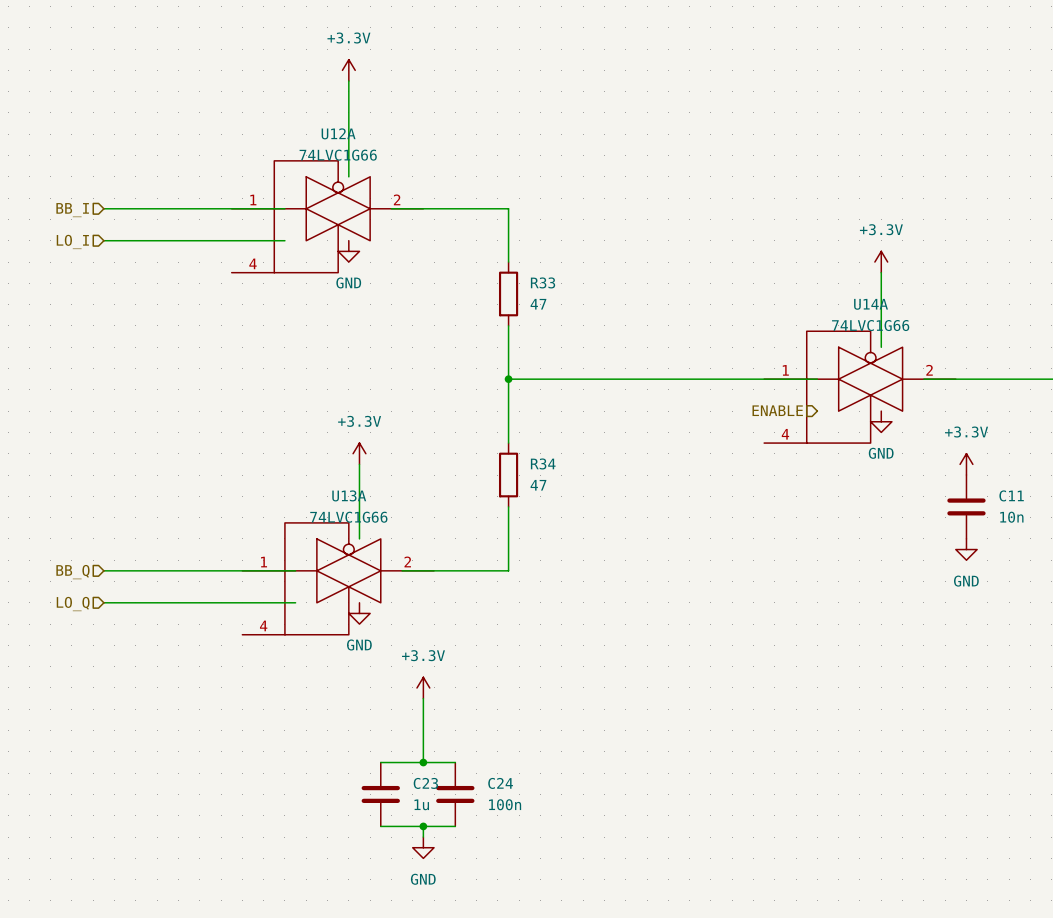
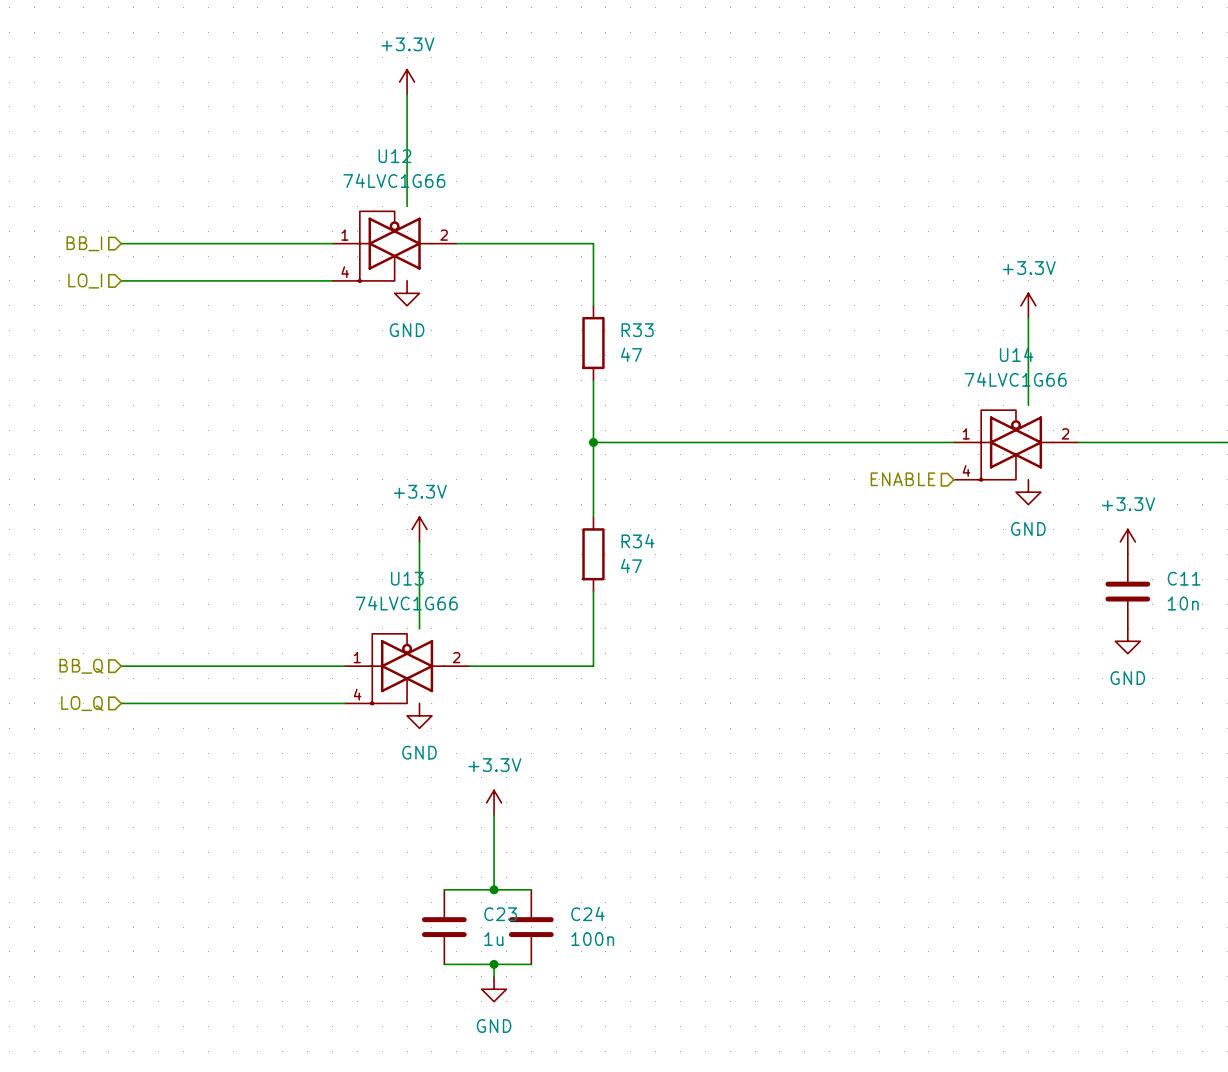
U12: none -> 74LVC1G66 (394, 246)
U12A: 74LVC1G66 (327, 216) -> none
U14: none -> 74LVC1G66 (1015, 445)
U14A: 74LVC1G66 (859, 387) -> none
U13: none -> 74LVC1G66 (407, 669)
U13A: 74LVC1G66 (338, 578) -> none

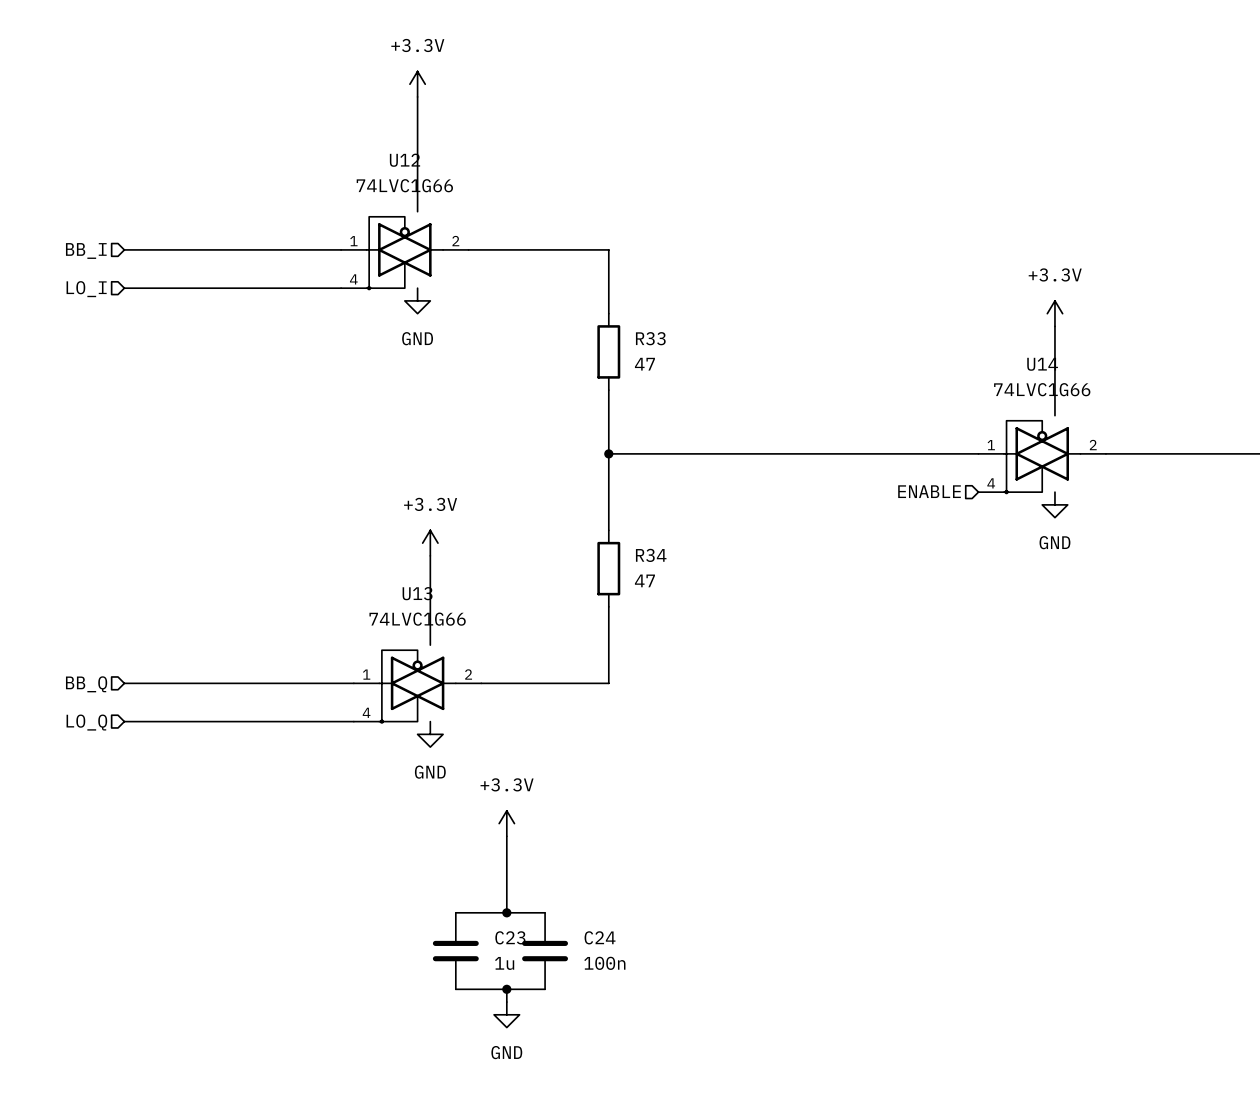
power symbol: +3.3V (1127, 541) -> none
C11: 10n (1127, 591) -> none
power symbol: GND (1127, 641) -> none

